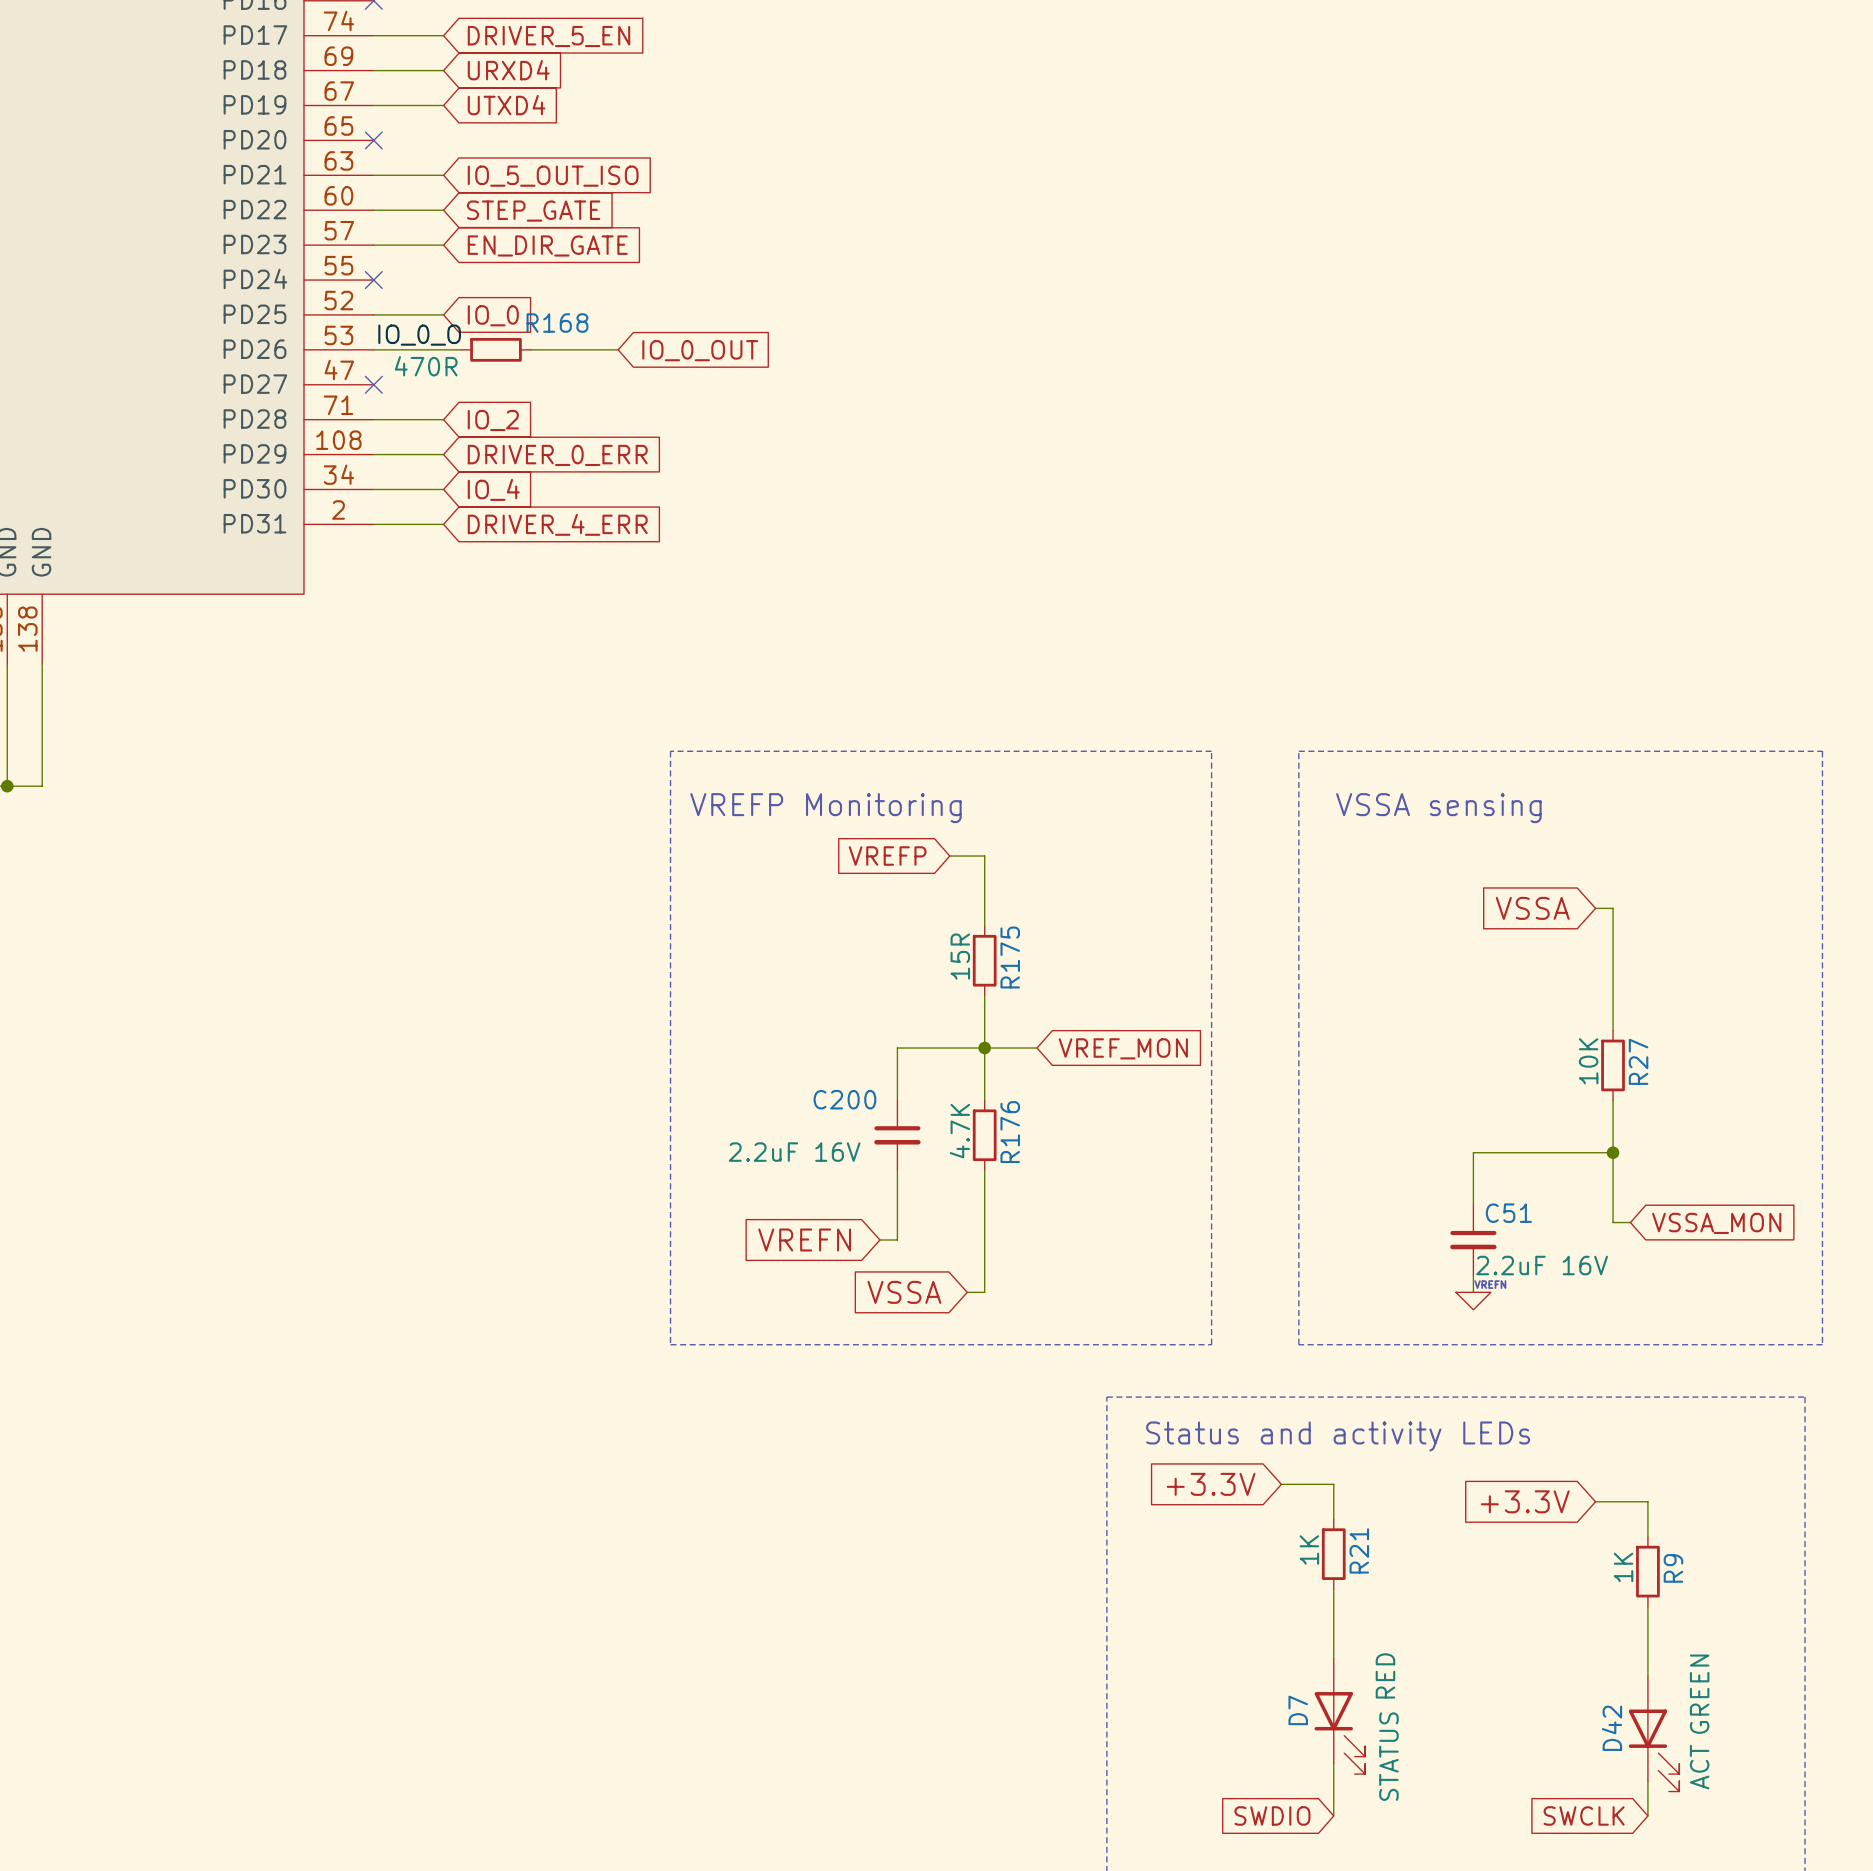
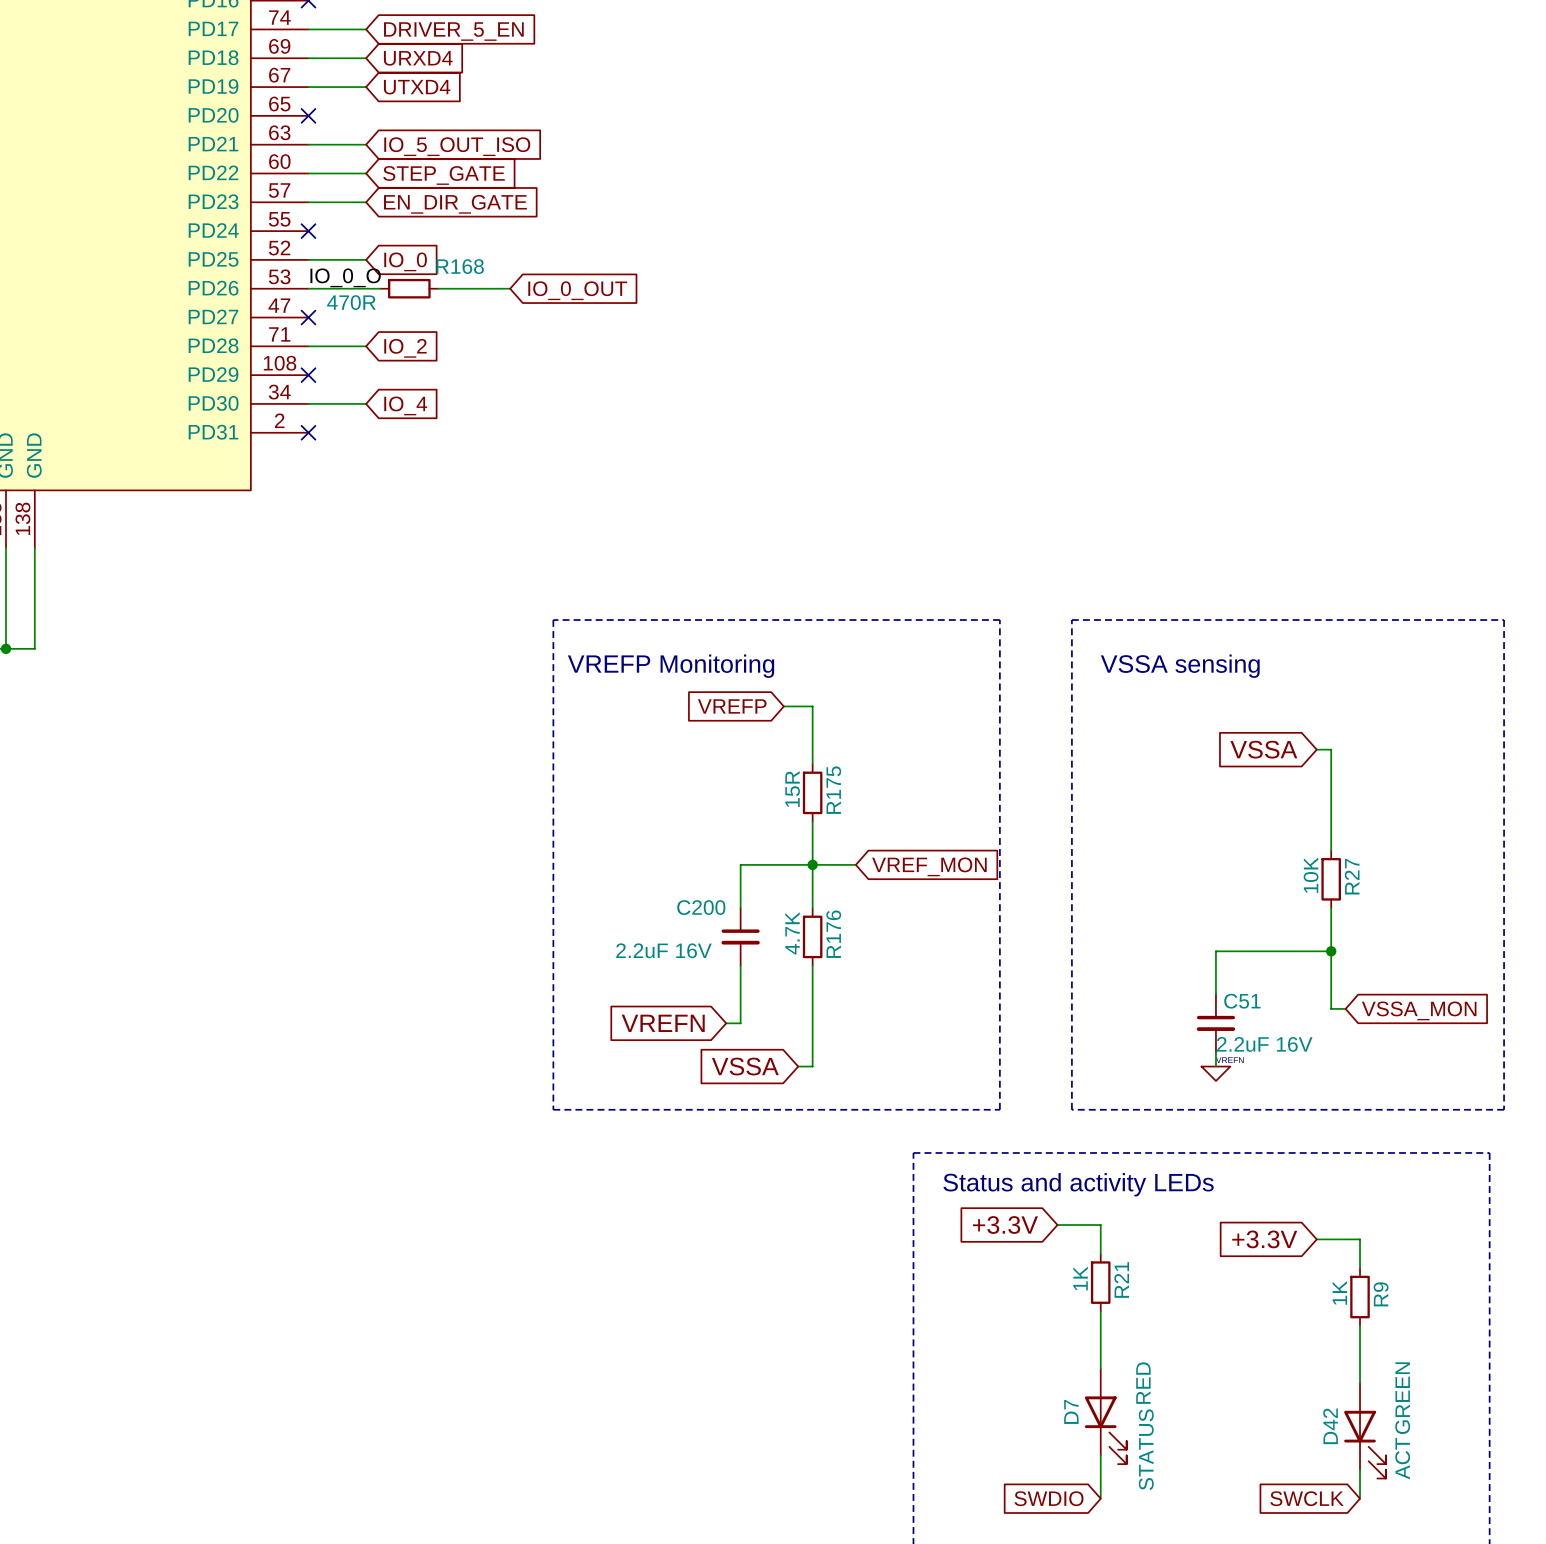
wire: (373, 454) (443, 454) -> none
no-connect mark: none -> (308, 375)
global label: DRIVER_0_ERR (557, 455) -> none
wire: (373, 524) (443, 524) -> none
no-connect mark: none -> (308, 432)
global label: DRIVER_4_ERR (557, 524) -> none

